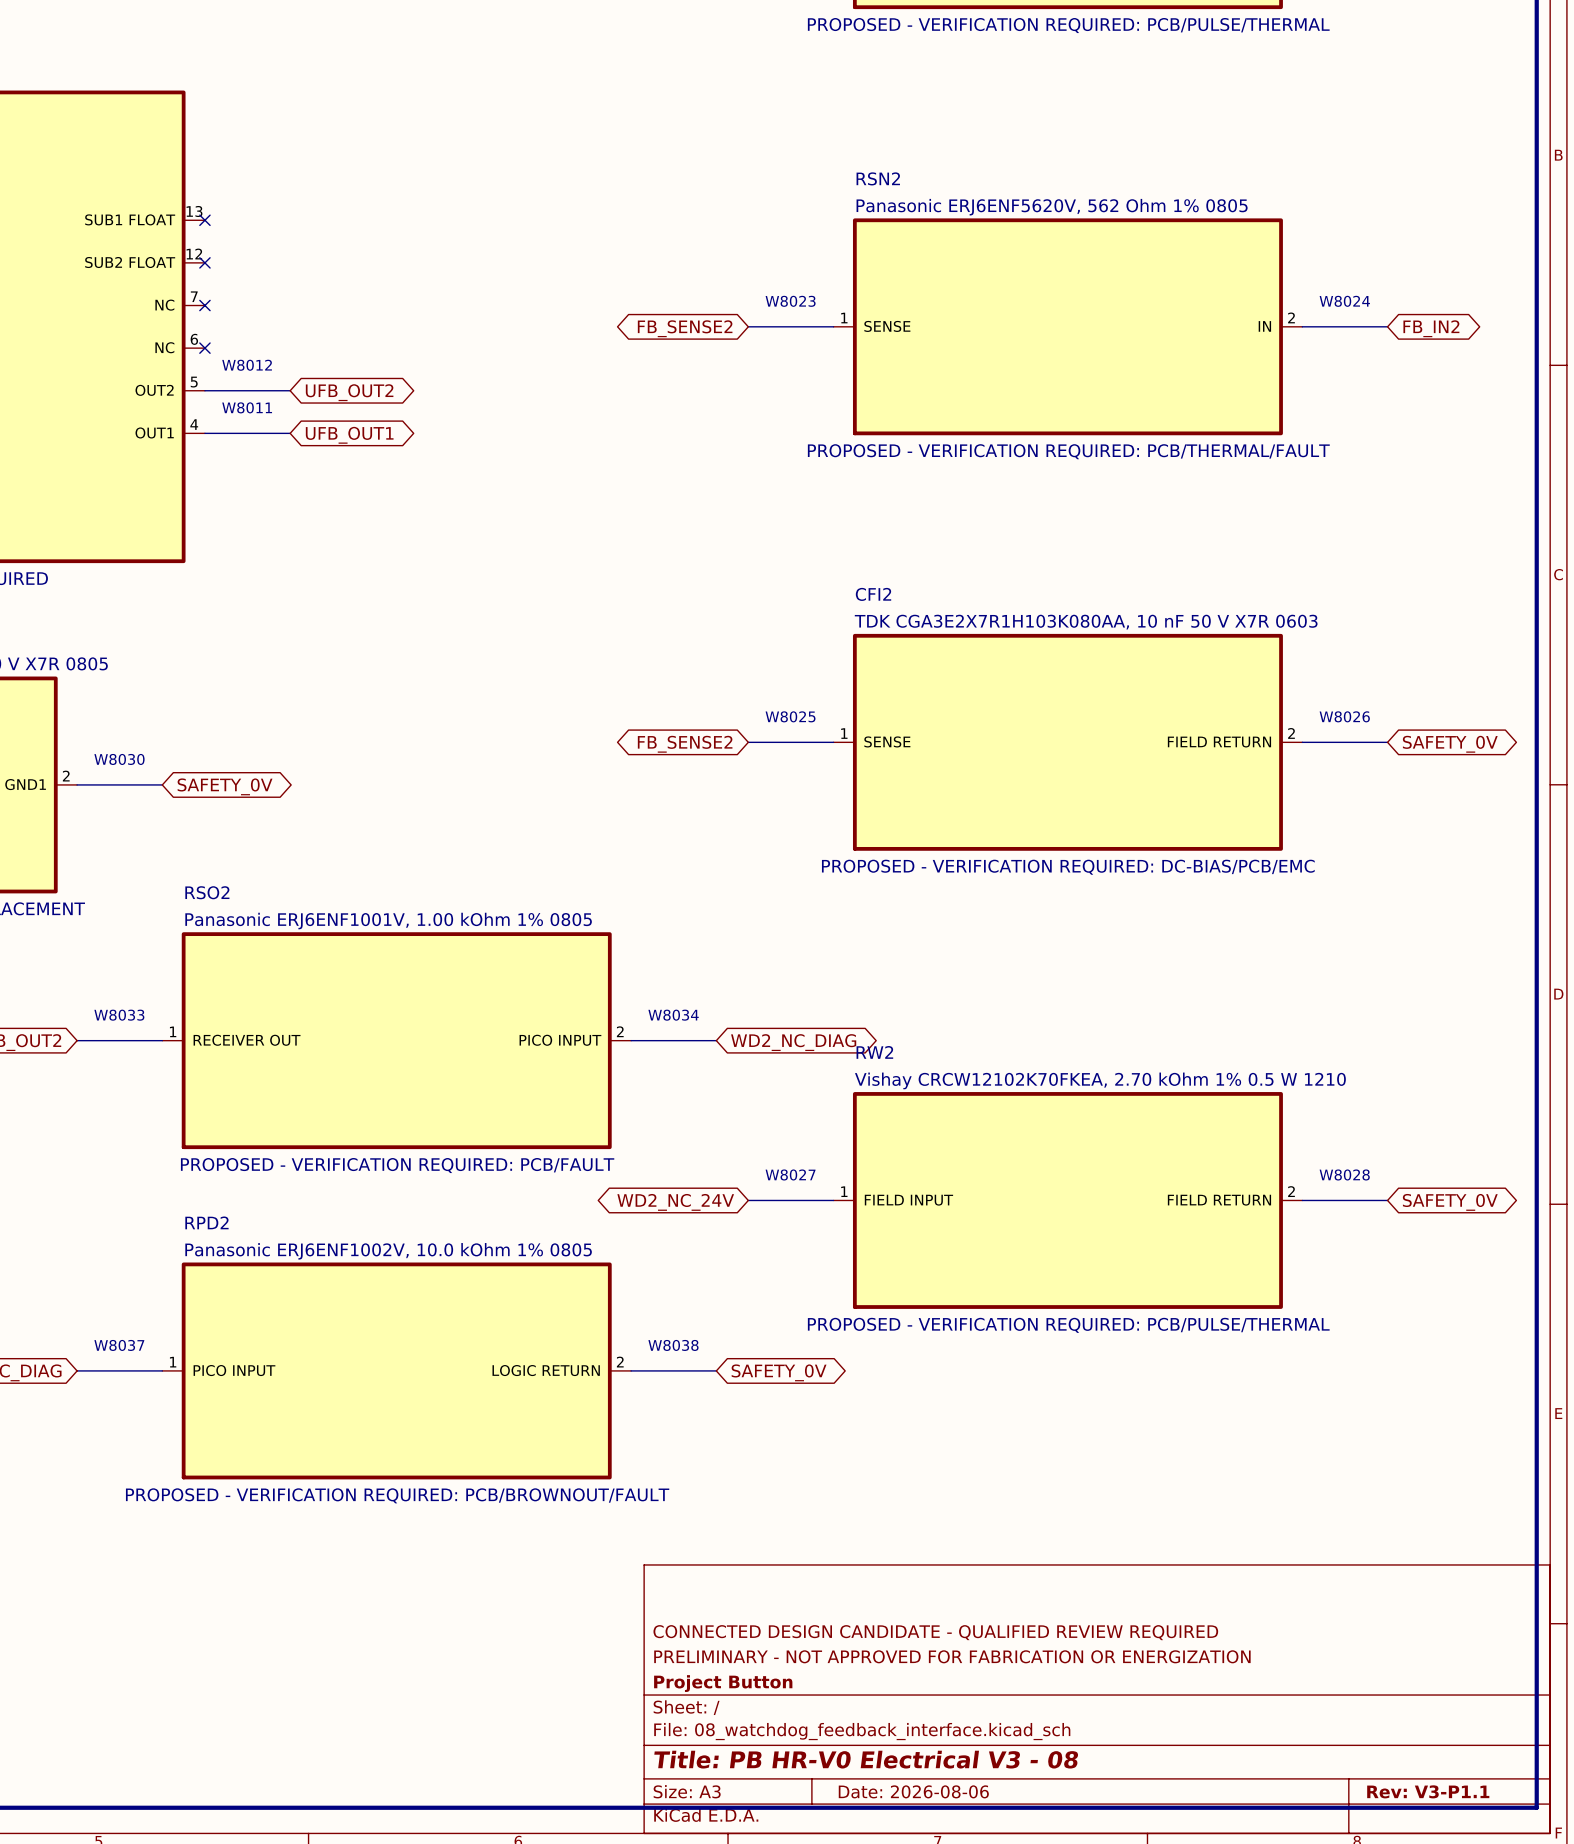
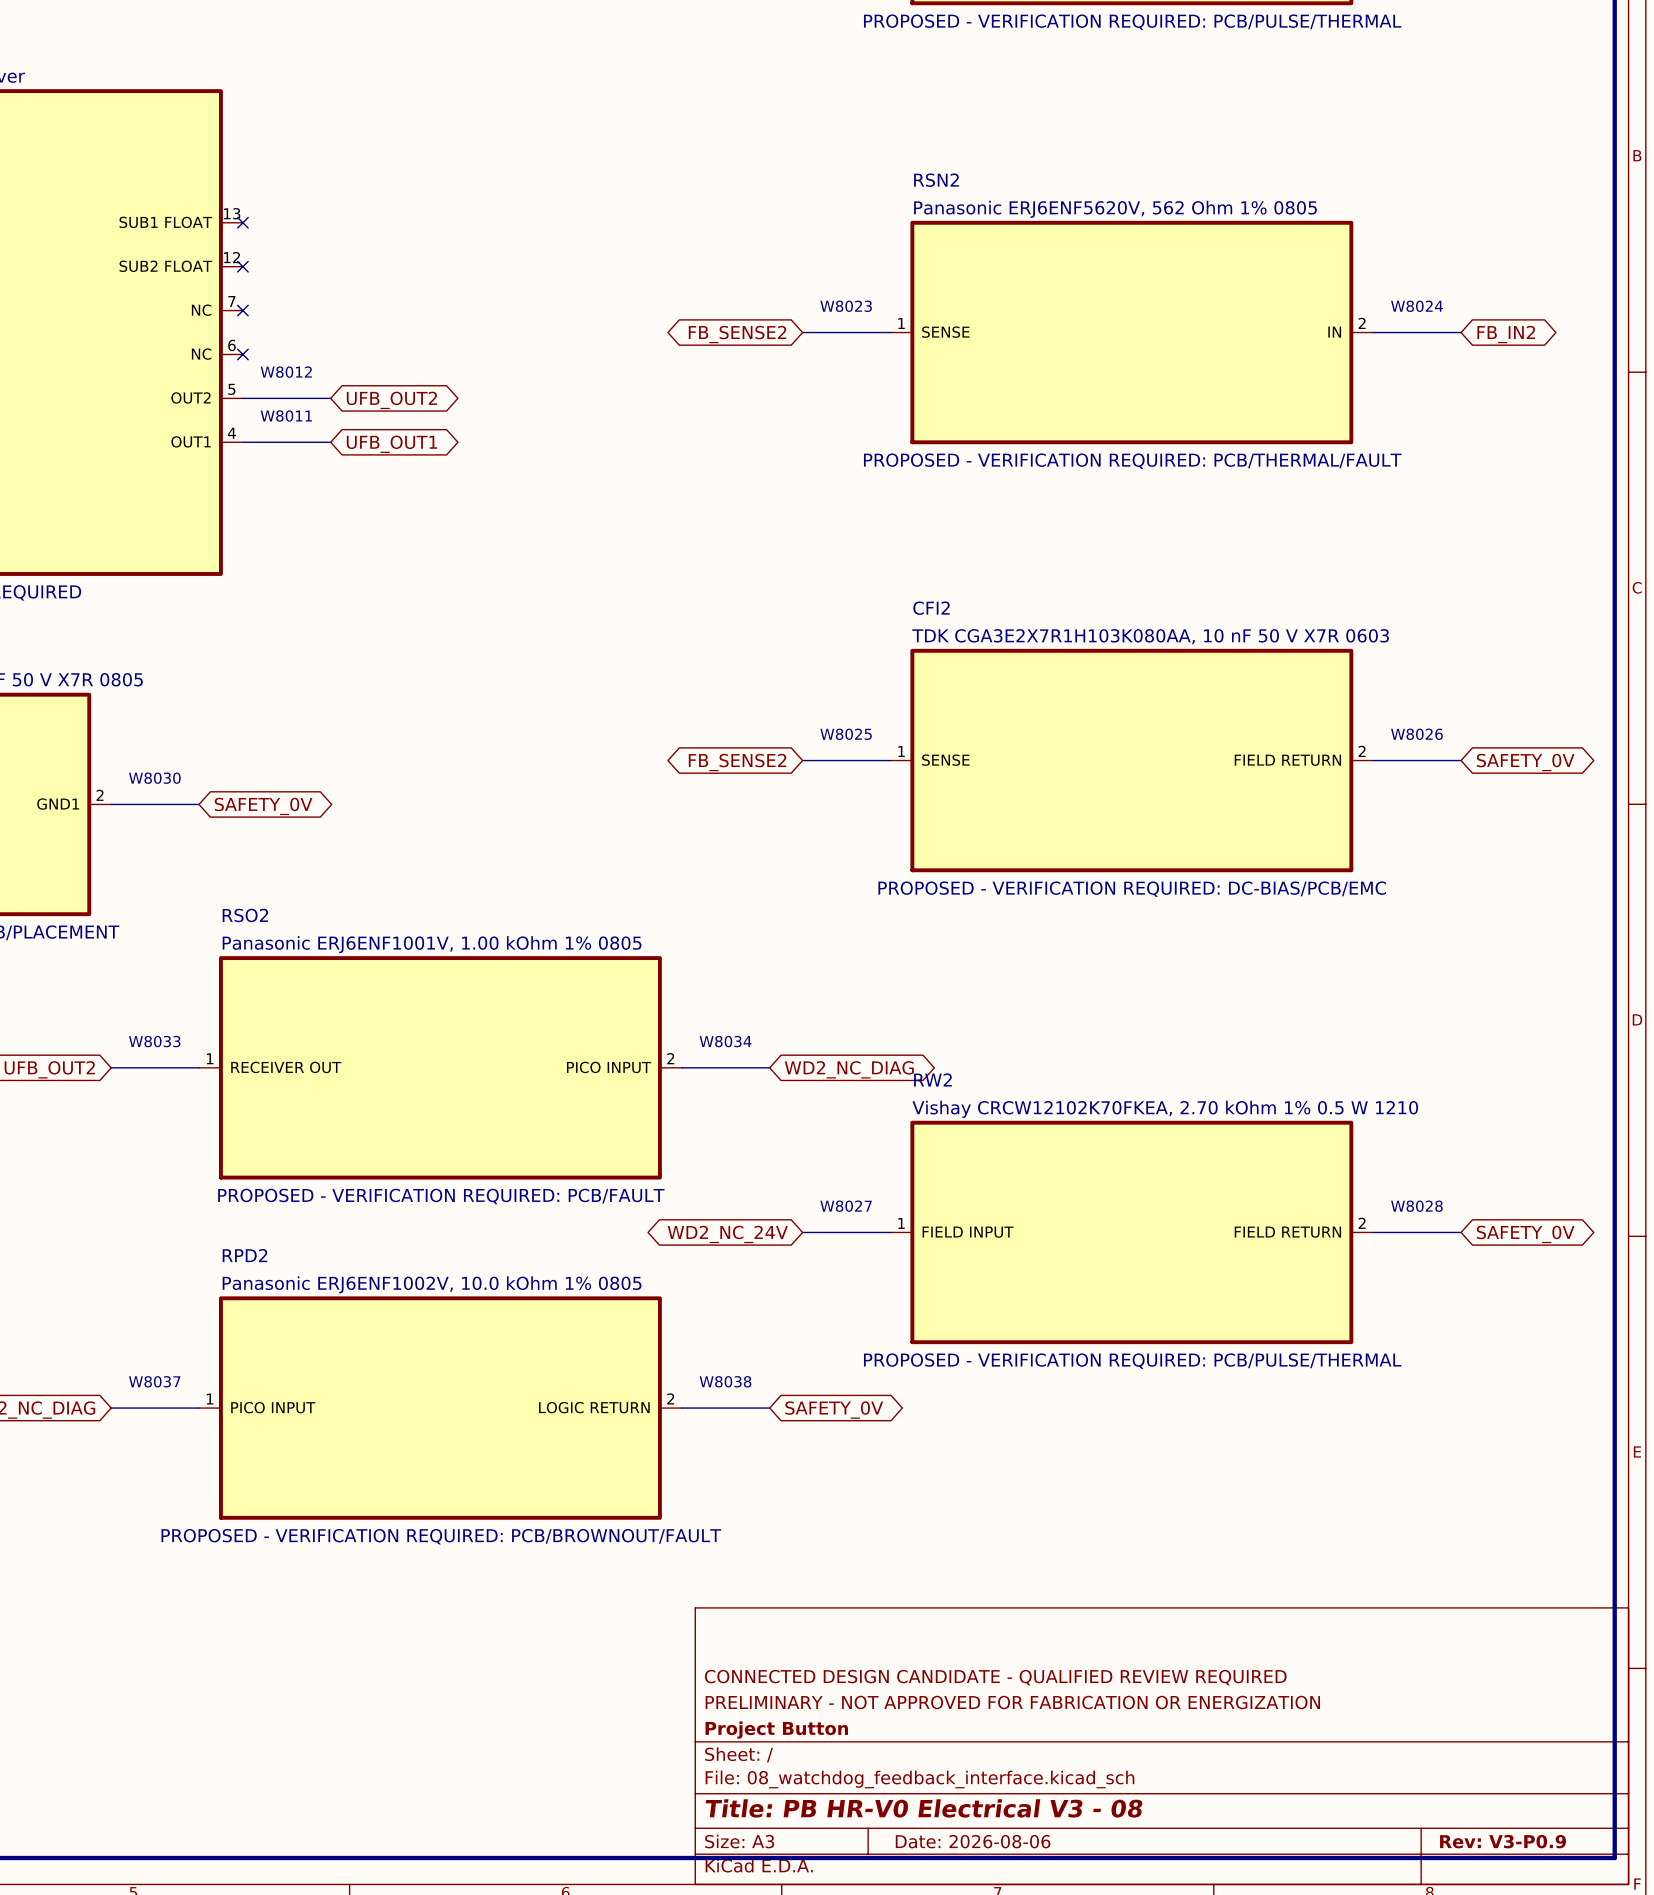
title block: Rev: V3-P1.1 (1428, 1791) -> Rev: V3-P0.9 (1503, 1841)

